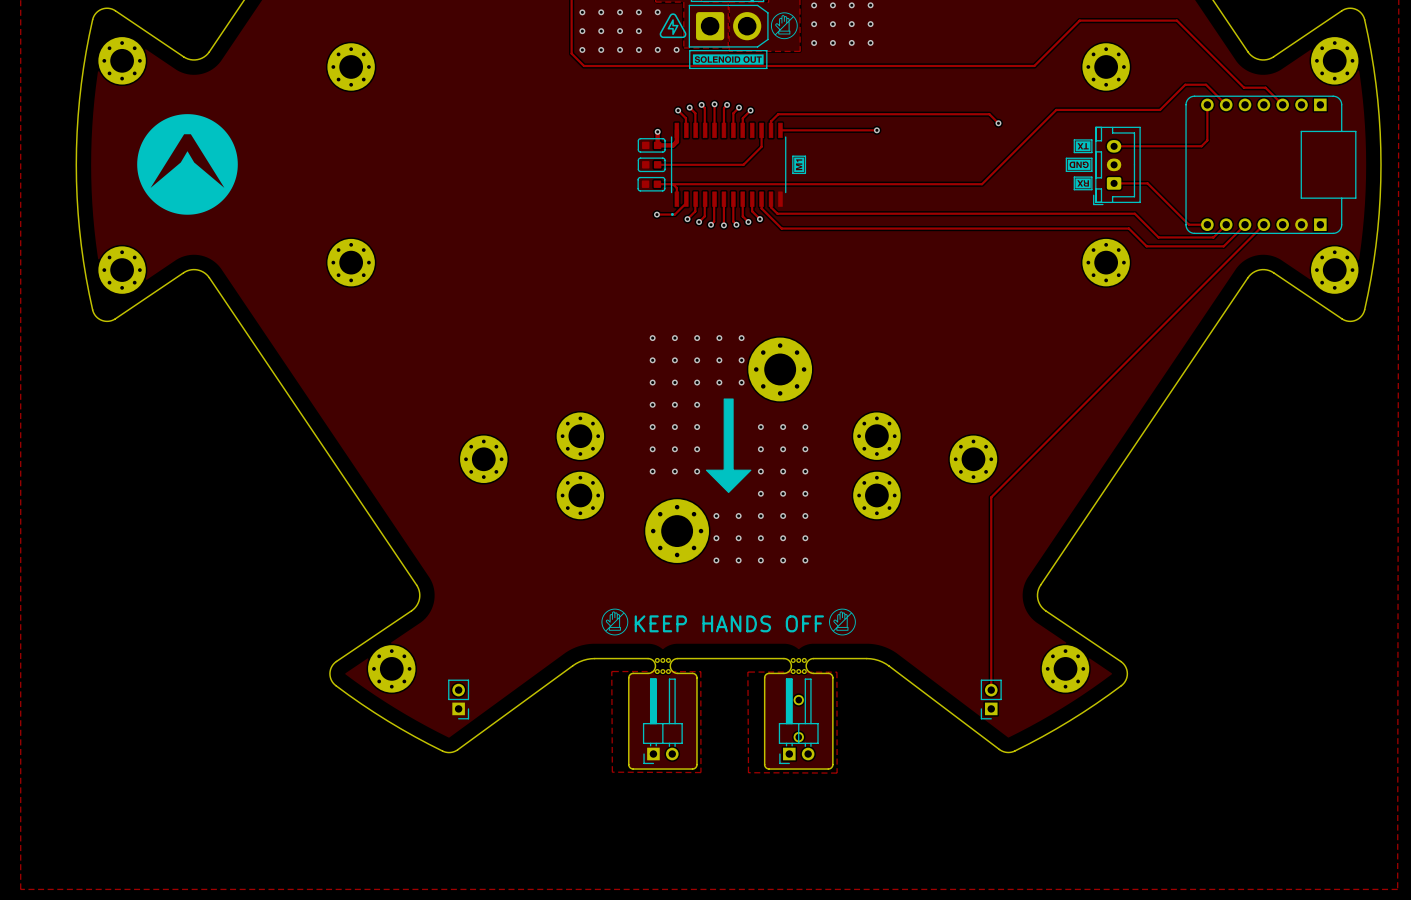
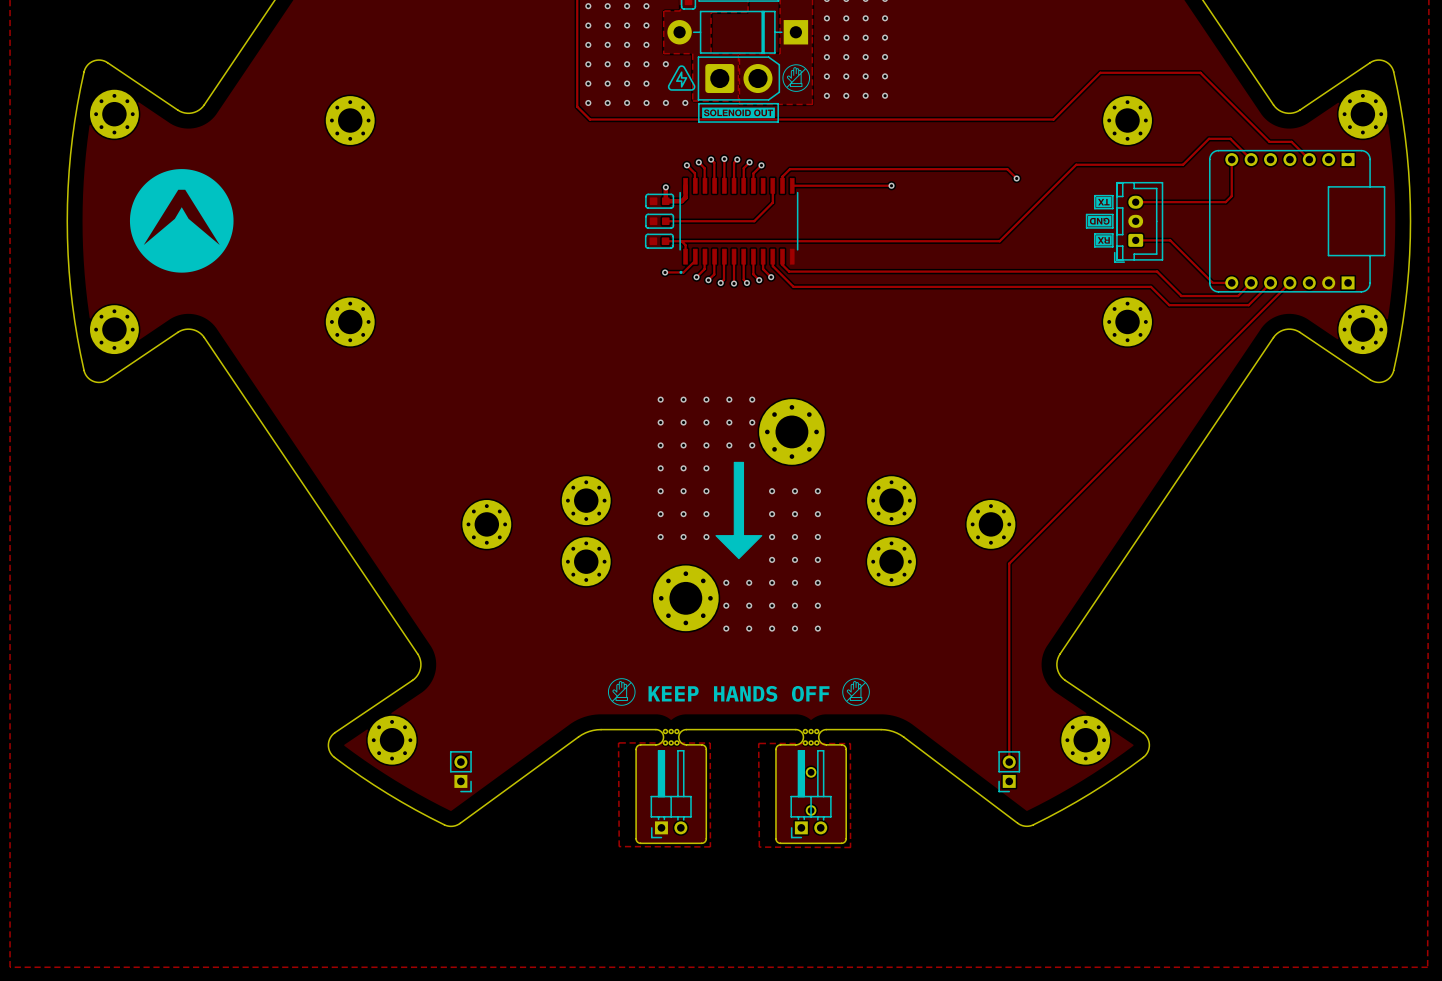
line: (792, 156) (805, 156) (805, 173) (792, 173) (792, 156) -> none
drawing: [794, 157, 805, 173] -> none

